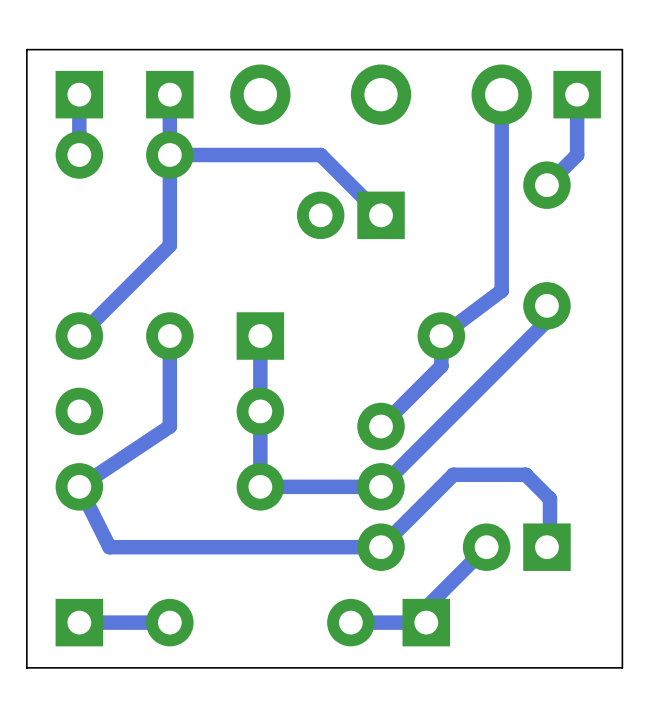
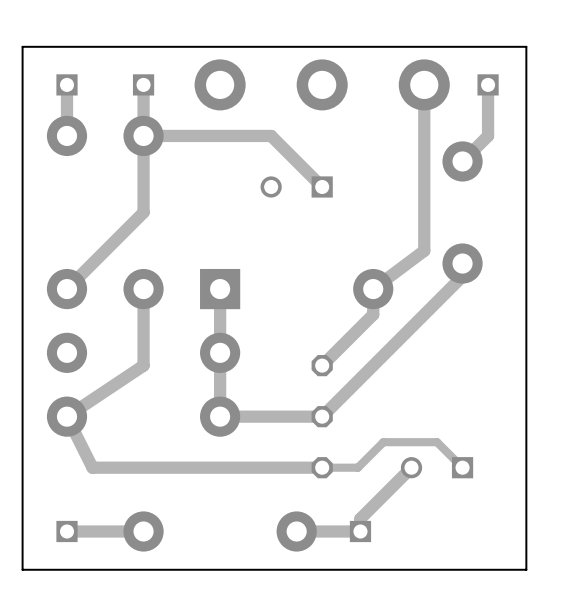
part footprint: [55, 70, 104, 119] -> [56, 74, 78, 96]
part footprint: [146, 70, 194, 119] -> [132, 74, 155, 96]
part footprint: [553, 70, 601, 119] -> [477, 74, 499, 96]
part footprint: [296, 191, 405, 240] -> [260, 176, 333, 198]
part footprint: [357, 402, 405, 571] -> [311, 355, 333, 479]
part footprint: [462, 523, 571, 571] -> [400, 457, 474, 479]
track: (546, 547) (549, 544) (549, 498) (525, 474) (453, 474) (381, 547) -> (462, 467) (437, 442) (383, 442) (357, 467) (322, 467)
part footprint: [55, 598, 104, 647] -> [56, 520, 78, 543]
part footprint: [402, 598, 451, 647] -> [349, 520, 372, 543]

